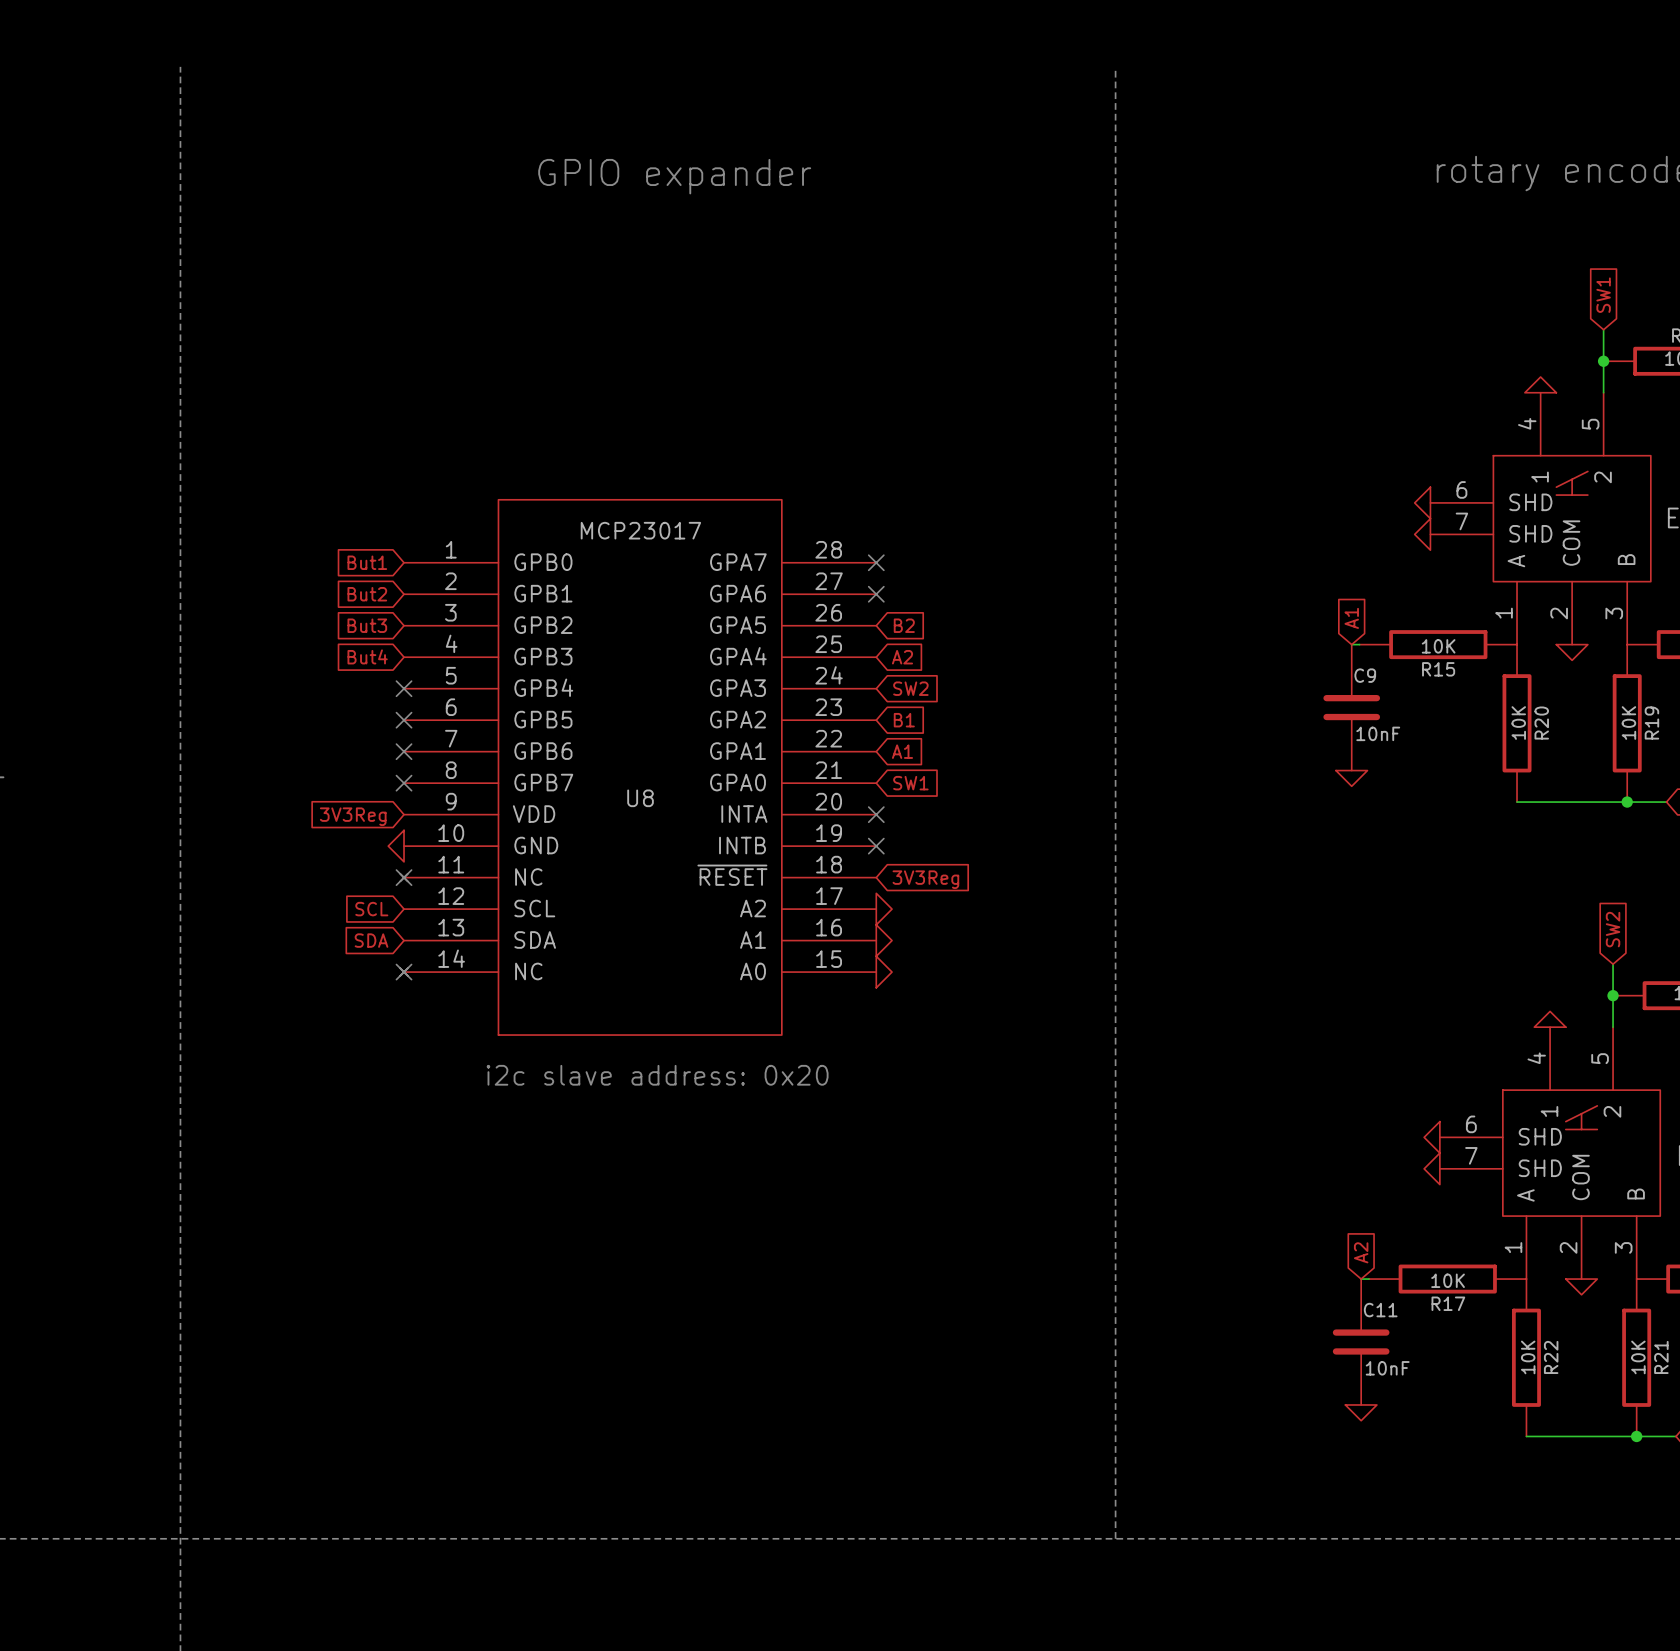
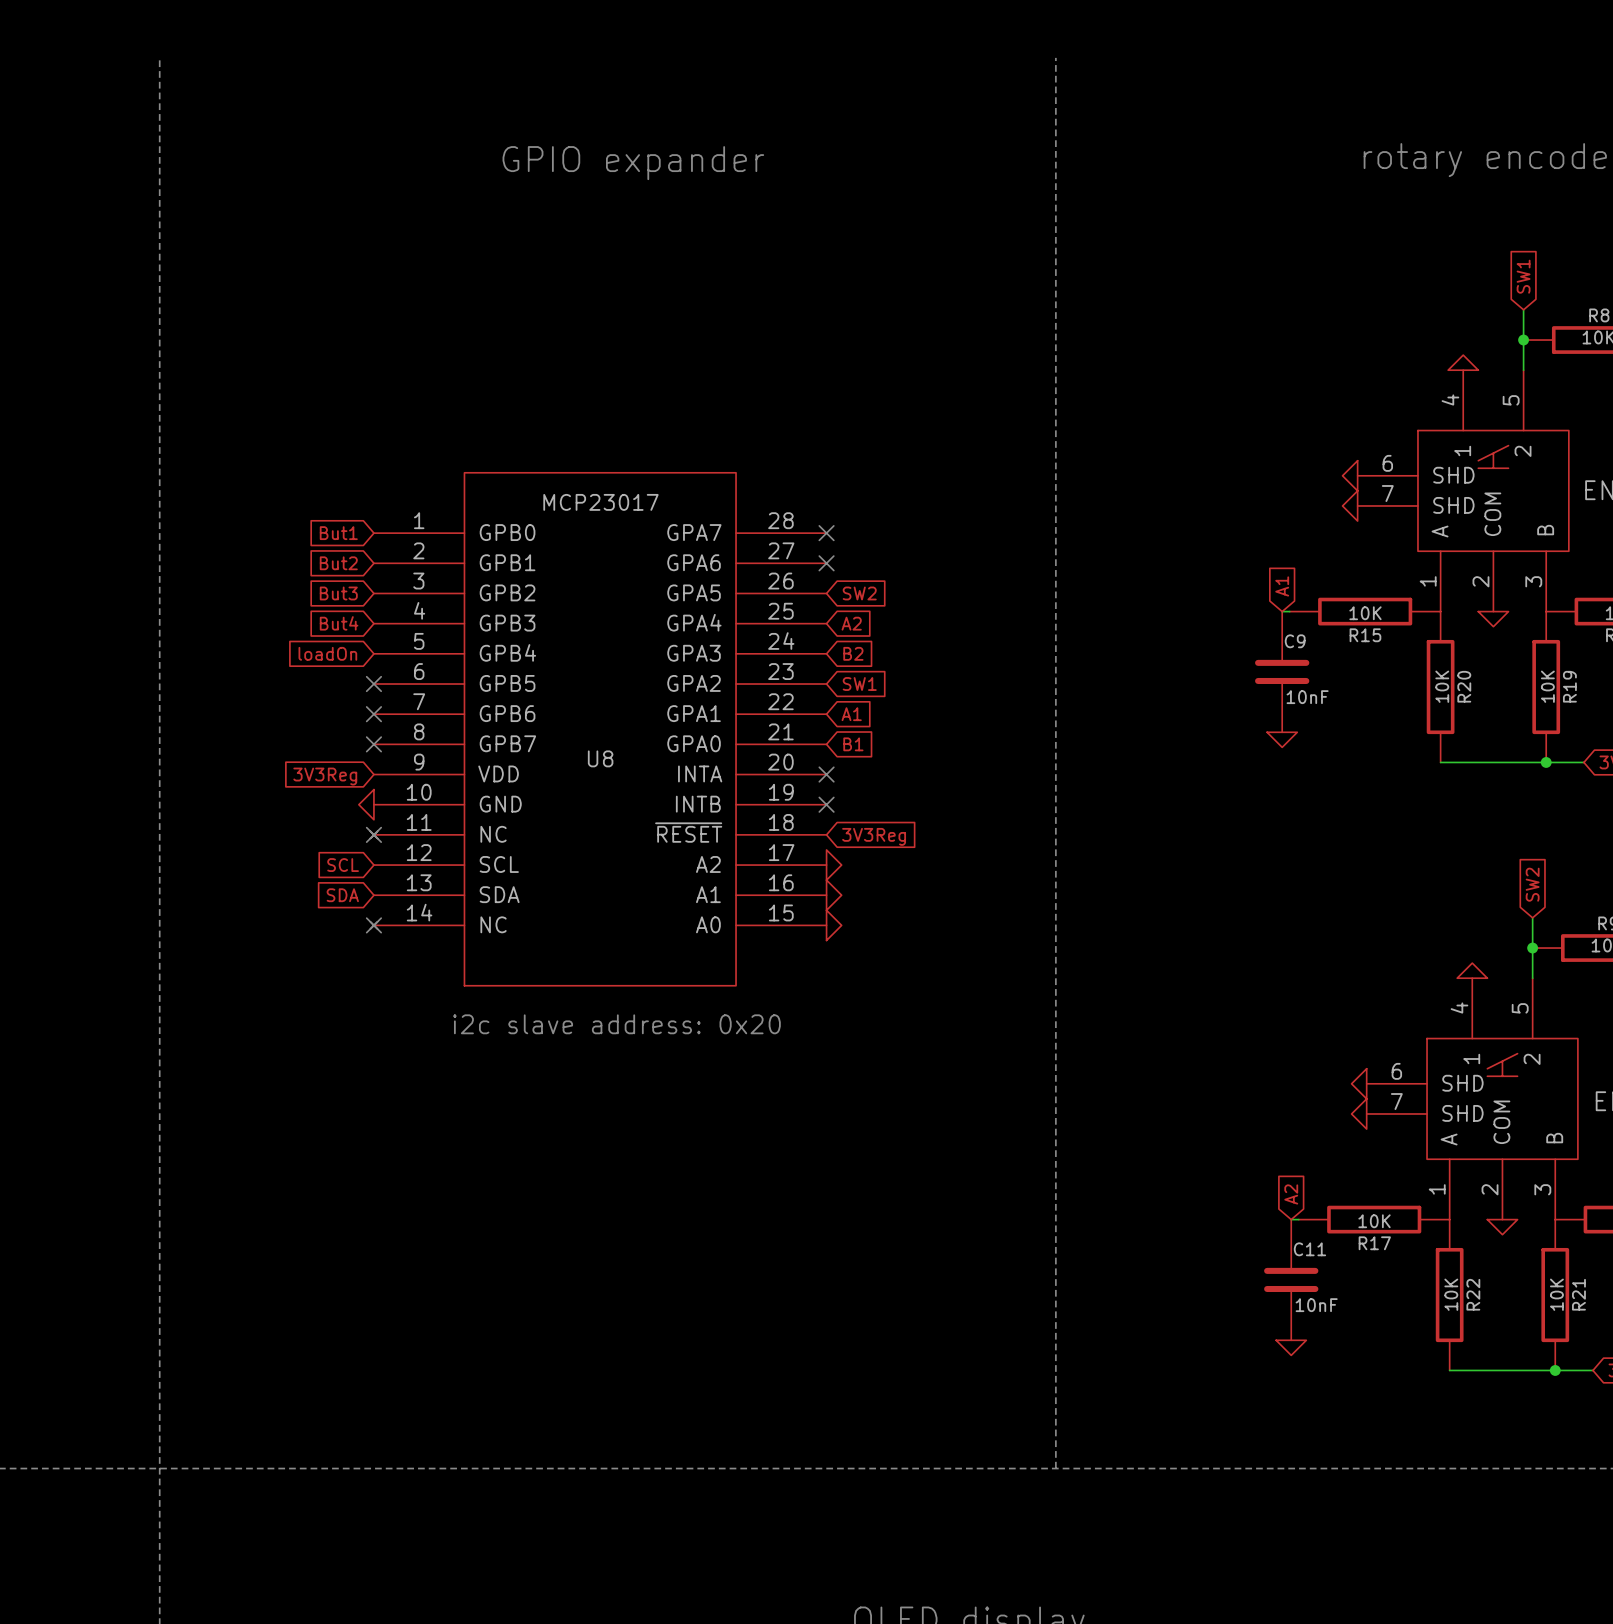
global label: B2 (904, 625) -> SW2 (859, 593)
global label: none -> loadOn (327, 653)
no-connect mark: (404, 688) -> none
global label: SW2 (910, 688) -> B2 (853, 653)
global label: B1 (904, 720) -> SW1 (859, 684)
global label: SW1 (910, 783) -> B1 (853, 744)

